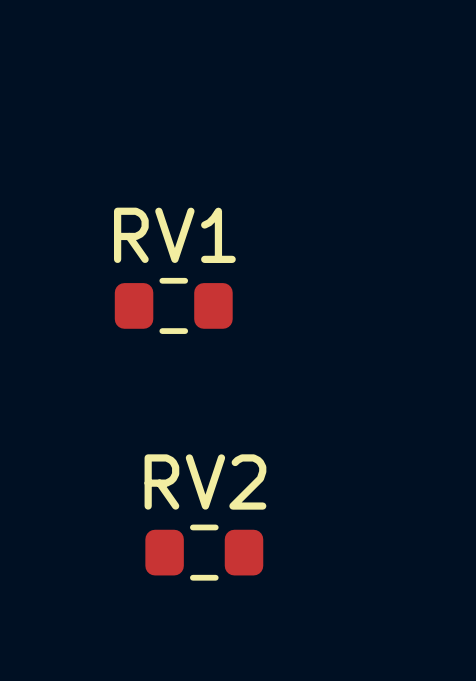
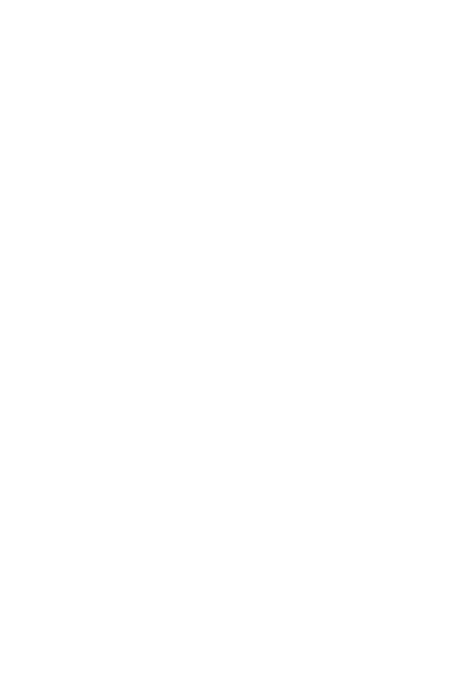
RV1: (173, 305) -> none
RV2: (204, 552) -> none

